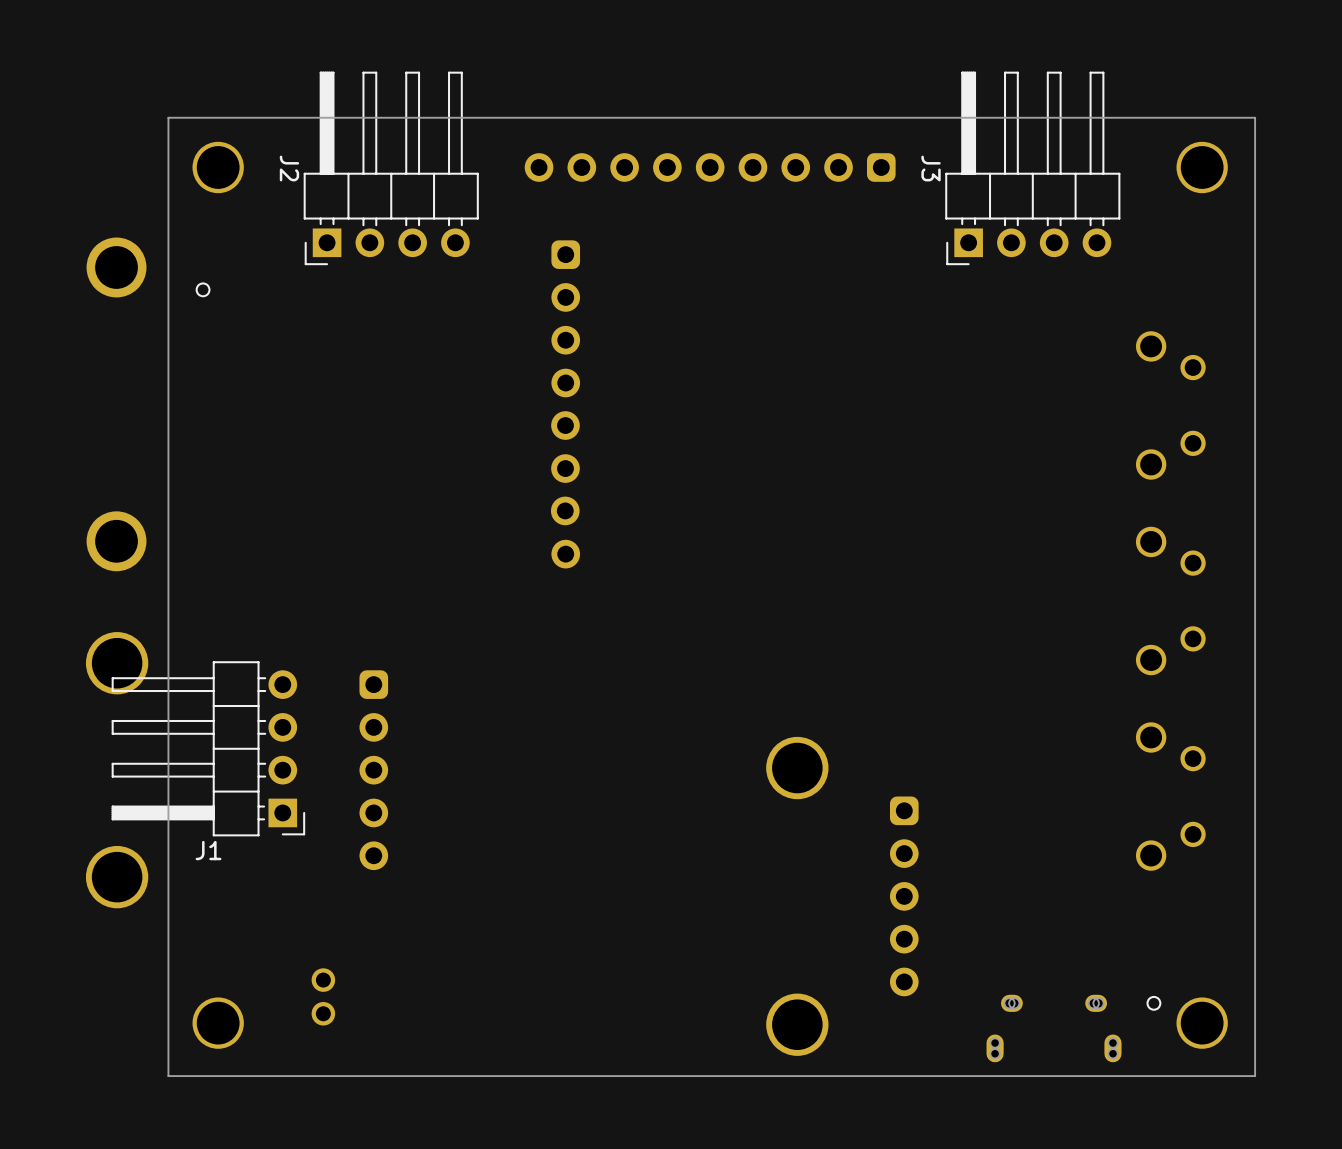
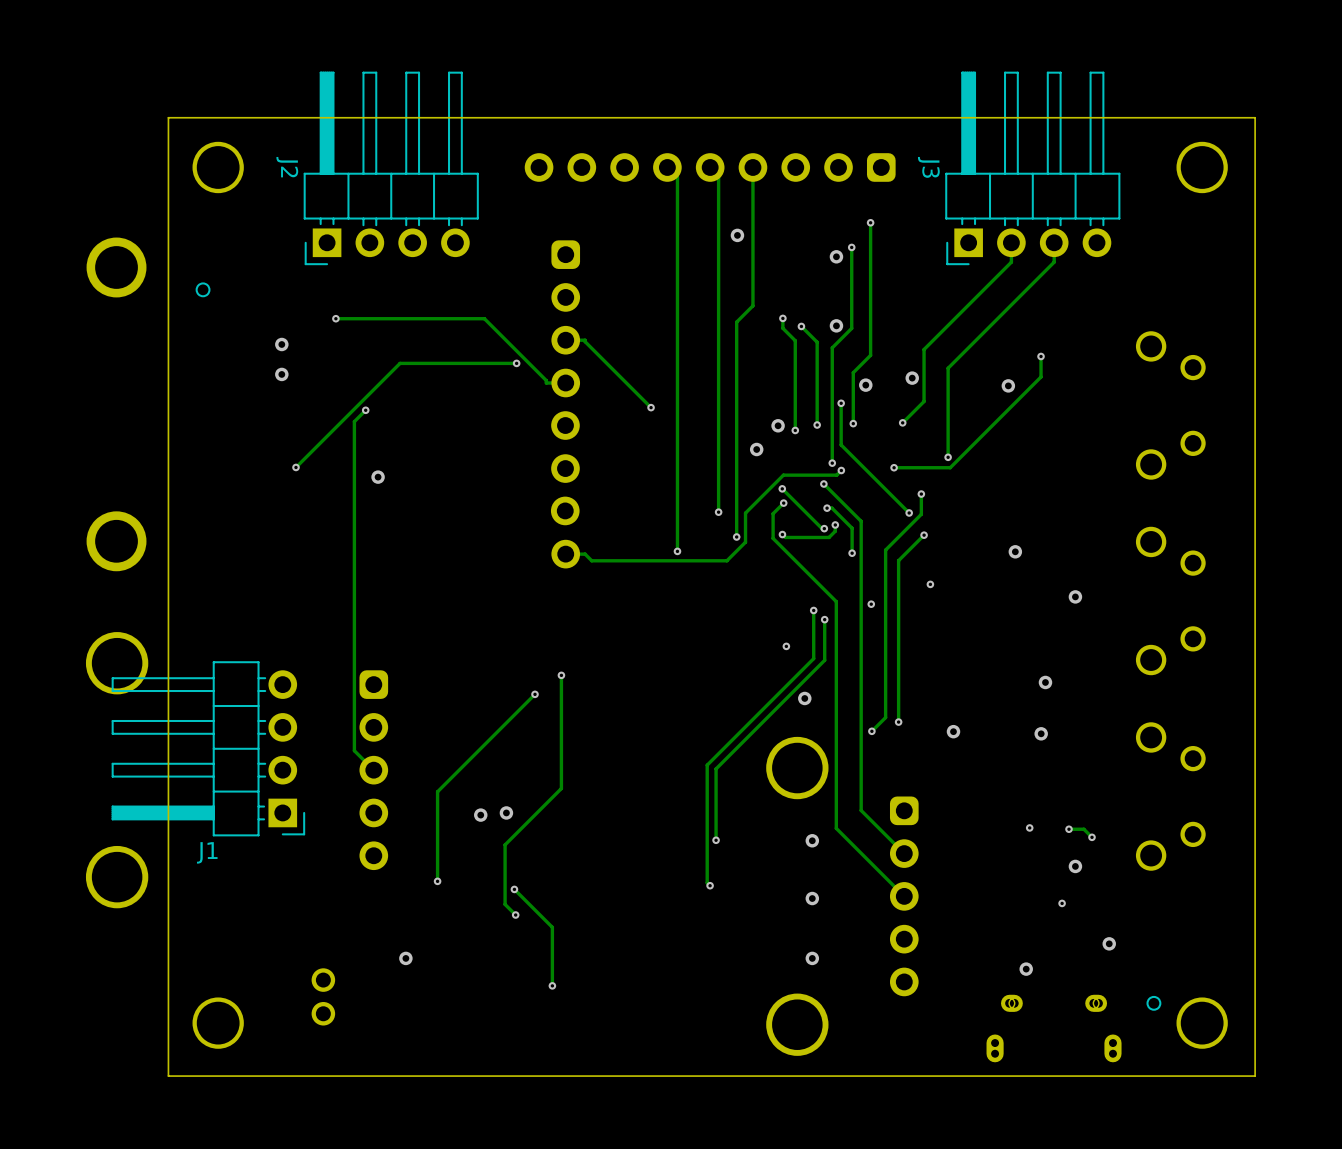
track: none -> (667, 167) (677, 177) (677, 551)
track: none -> (710, 167) (718, 175) (718, 512)
track: none -> (752, 167) (752, 305) (736, 322) (736, 537)
track: none -> (870, 222) (870, 355) (853, 372) (853, 423)
via: none -> (870, 222)
via: none -> (737, 235)
track: none -> (1011, 242) (1011, 262) (924, 349) (924, 401) (902, 422)
track: none -> (1054, 242) (1054, 262) (948, 368) (948, 457)
track: none -> (851, 247) (851, 328) (832, 347) (832, 463)
via: none -> (851, 247)
via: none -> (836, 256)
track: none -> (335, 318) (484, 318) (546, 380) (546, 383) (565, 383)
via: none -> (335, 318)
track: none -> (782, 318) (782, 328) (795, 340) (795, 430)
via: none -> (782, 318)
via: none -> (836, 325)
track: none -> (801, 326) (817, 342) (817, 425)
via: none -> (801, 326)
track: none -> (565, 340) (585, 340) (651, 407)
via: none -> (281, 344)
track: none -> (1041, 356) (1041, 376) (950, 467) (894, 467)
via: none -> (1041, 356)
track: none -> (516, 363) (400, 363) (295, 467)
via: none -> (516, 363)
via: none -> (281, 374)
via: none -> (912, 378)
via: none -> (865, 385)
via: none -> (1008, 385)
track: none -> (841, 403) (841, 444) (909, 512)
via: none -> (841, 403)
via: none -> (651, 407)
track: none -> (365, 410) (354, 421) (354, 750) (373, 770)
via: none -> (365, 410)
via: none -> (902, 422)
via: none -> (853, 423)
via: none -> (778, 425)
via: none -> (817, 425)
via: none -> (795, 430)
via: none -> (756, 449)
via: none -> (948, 457)
via: none -> (832, 463)
via: none -> (295, 467)
via: none -> (894, 467)
track: none -> (841, 470) (836, 475) (783, 475) (745, 513) (745, 542) (726, 560) (591, 560) (585, 554) (565, 554)
via: none -> (841, 470)
via: none -> (378, 477)
track: none -> (823, 484) (861, 521) (861, 810) (904, 853)
via: none -> (823, 484)
track: none -> (782, 488) (822, 528) (824, 528)
via: none -> (782, 488)
track: none -> (921, 494) (921, 514) (885, 550) (885, 717) (871, 731)
via: none -> (921, 494)
track: none -> (783, 503) (773, 513) (773, 538) (836, 601) (836, 828) (904, 896)
via: none -> (783, 503)
track: none -> (827, 508) (832, 508) (852, 528) (852, 553)
via: none -> (827, 508)
via: none -> (718, 512)
via: none -> (909, 512)
track: none -> (835, 524) (835, 531) (829, 537) (785, 537) (782, 534)
via: none -> (835, 524)
via: none -> (824, 528)
via: none -> (782, 534)
track: none -> (924, 535) (898, 560) (898, 722)
via: none -> (924, 535)
via: none -> (736, 537)
via: none -> (677, 551)
via: none -> (1015, 551)
via: none -> (852, 553)
via: none -> (930, 584)
via: none -> (1075, 596)
via: none -> (871, 604)
track: none -> (813, 610) (813, 658) (707, 765) (707, 882) (710, 885)
via: none -> (813, 610)
track: none -> (824, 619) (824, 660) (716, 768) (716, 840)
via: none -> (824, 619)
via: none -> (786, 646)
track: none -> (561, 675) (561, 788) (505, 844) (505, 904) (515, 915)
via: none -> (561, 675)
via: none -> (1045, 682)
track: none -> (535, 694) (437, 791) (437, 881)
via: none -> (535, 694)
via: none -> (804, 698)
via: none -> (898, 722)
via: none -> (871, 731)
via: none -> (953, 731)
via: none -> (1041, 733)
via: none -> (506, 812)
via: none -> (480, 815)
via: none -> (1029, 827)
track: none -> (1069, 829) (1083, 829) (1092, 837)
via: none -> (1069, 829)
via: none -> (1092, 837)
via: none -> (716, 840)
via: none -> (812, 840)
via: none -> (1075, 866)
via: none -> (437, 881)
via: none -> (710, 885)
track: none -> (514, 889) (552, 927) (552, 985)
via: none -> (514, 889)
via: none -> (812, 898)
via: none -> (1062, 903)
via: none -> (515, 915)
via: none -> (1109, 943)
via: none -> (405, 958)
via: none -> (812, 958)
via: none -> (1026, 969)
via: none -> (552, 985)

